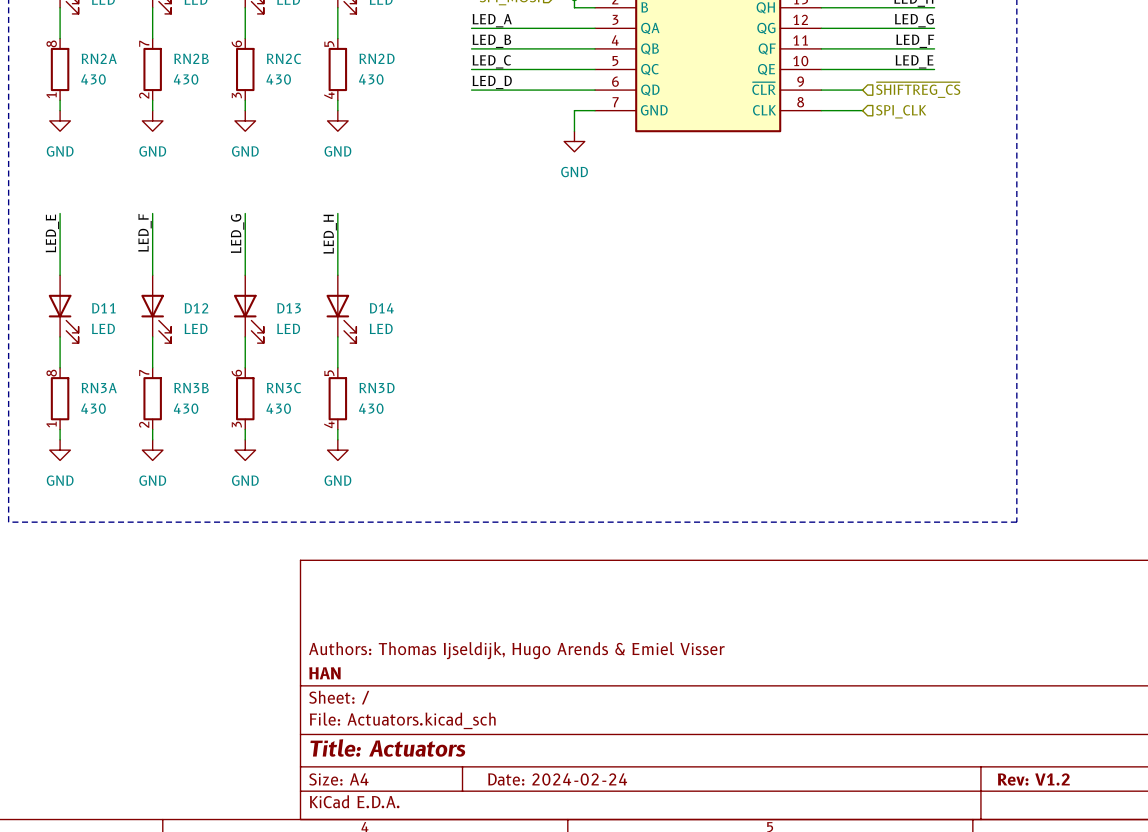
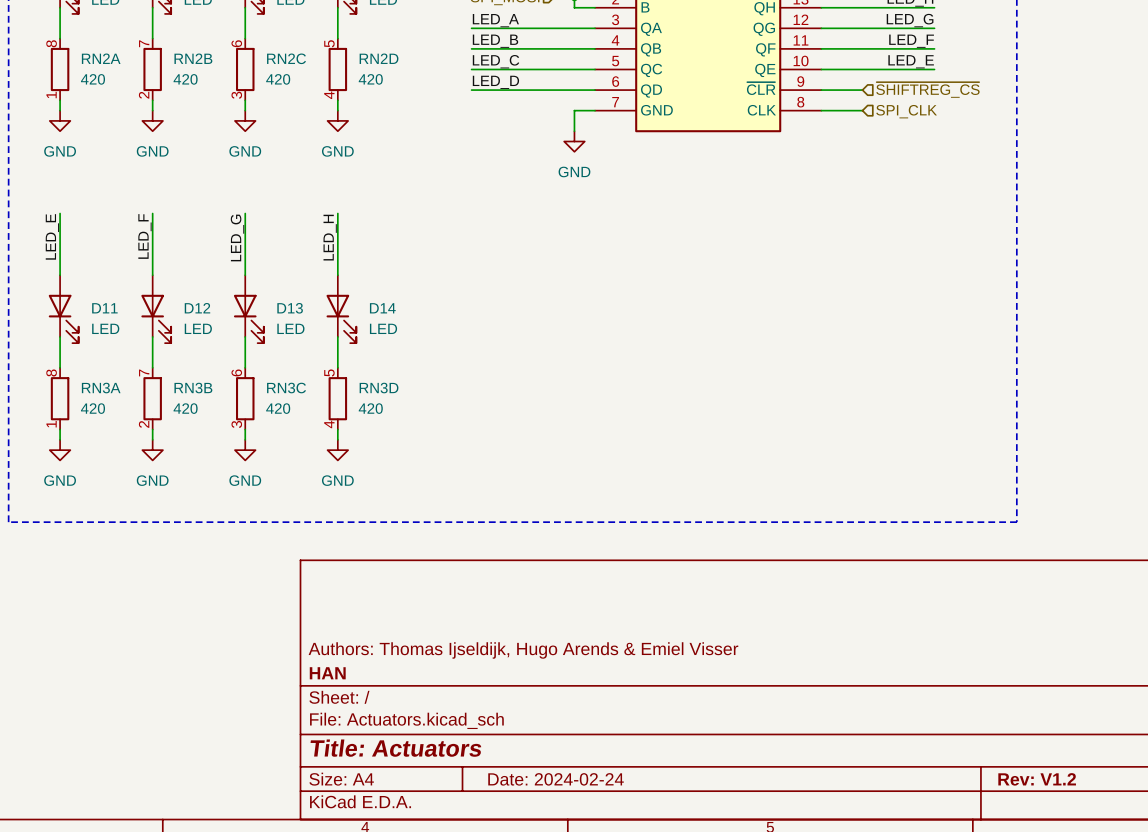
RN2A value: 430 (93, 79) -> 420 (93, 79)
RN2B value: 430 (186, 79) -> 420 (185, 79)
RN2C value: 430 (278, 79) -> 420 (278, 79)
RN2D value: 430 (371, 79) -> 420 (370, 79)
RN3A value: 430 (93, 408) -> 420 (93, 408)
RN3B value: 430 (186, 408) -> 420 (185, 408)
RN3C value: 430 (278, 408) -> 420 (278, 408)
RN3D value: 430 (371, 408) -> 420 (370, 408)

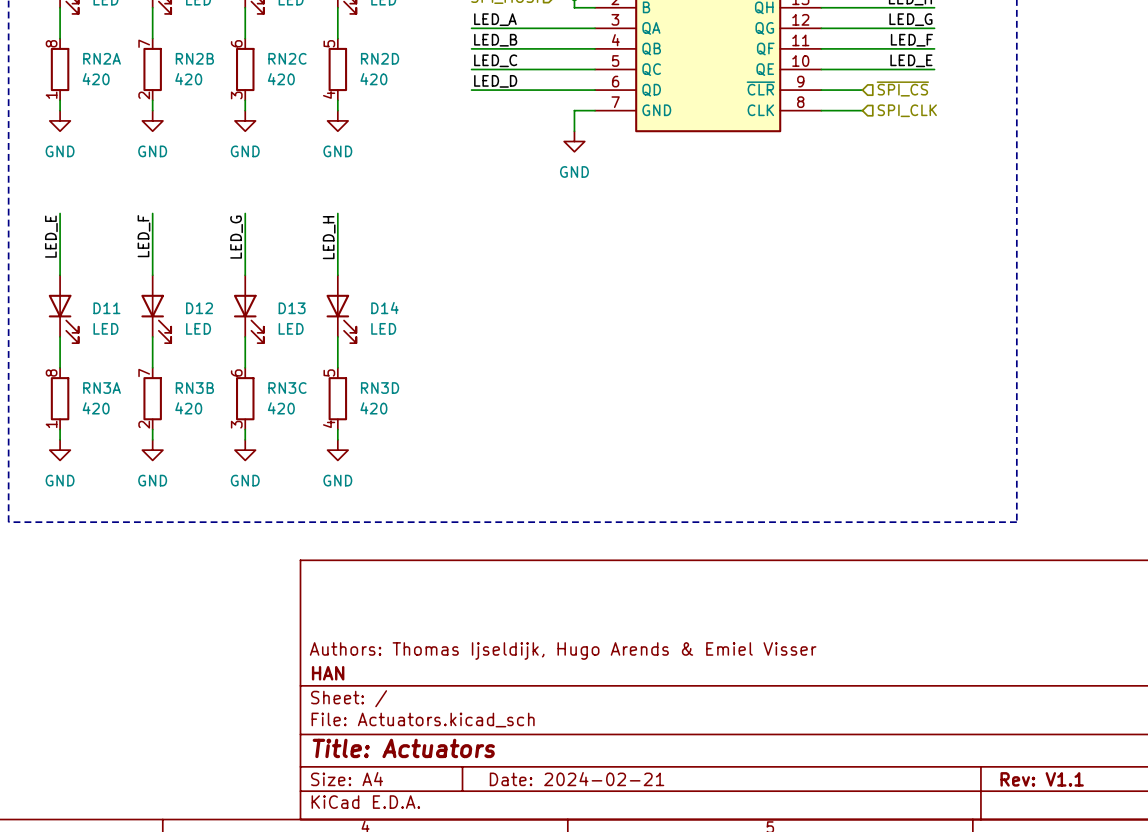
hierarchical label: ~{SHIFTREG_CS} (927, 89) -> ~{SPI_CS} (902, 88)
title block: Date: 2024-02-24 (556, 779) -> Date: 2024-02-21 (577, 779)
title block: Rev: V1.2 (1037, 779) -> Rev: V1.1 (1042, 779)

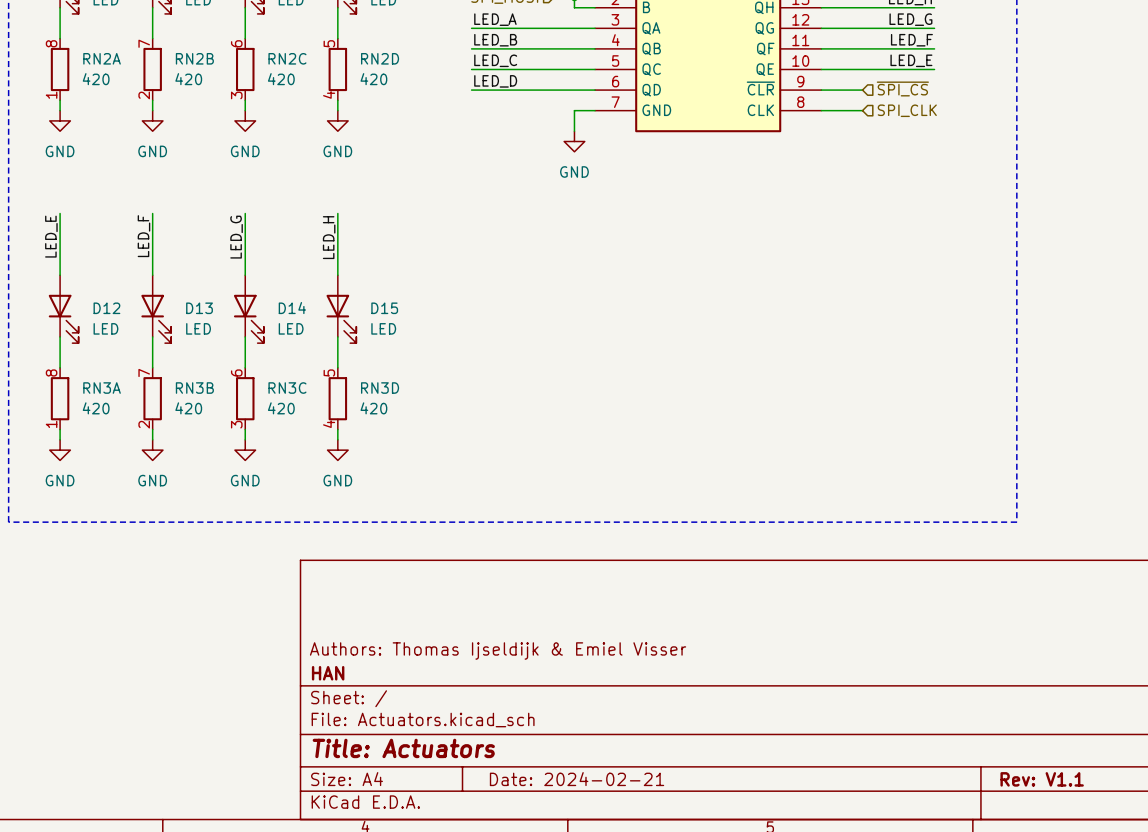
D11 name: D11 (106, 308) -> D12 (106, 308)
D12 name: D12 (199, 308) -> D13 (199, 308)
D13 name: D13 (292, 308) -> D14 (292, 308)
D14 name: D14 (384, 308) -> D15 (384, 308)
title block: Authors: Thomas Ijseldijk, Hugo Arends & Emiel Visser (563, 650) -> Authors: Thomas Ijseldijk & Emiel Visser (498, 650)

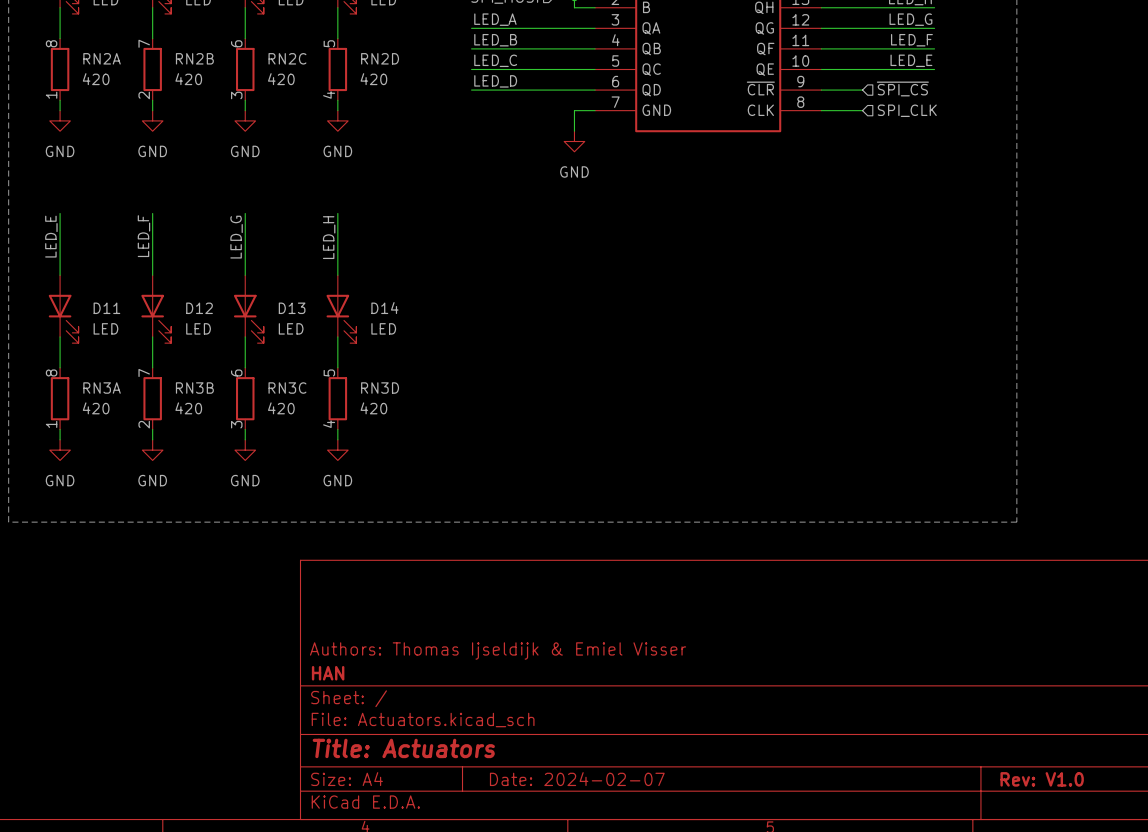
D12 name: D12 (106, 308) -> D11 (106, 308)
D13 name: D13 (199, 308) -> D12 (199, 308)
D14 name: D14 (292, 308) -> D13 (292, 308)
D15 name: D15 (384, 308) -> D14 (384, 308)
title block: Date: 2024-02-21 (577, 779) -> Date: 2024-02-07 (577, 779)
title block: Rev: V1.1 (1042, 779) -> Rev: V1.0 (1042, 779)

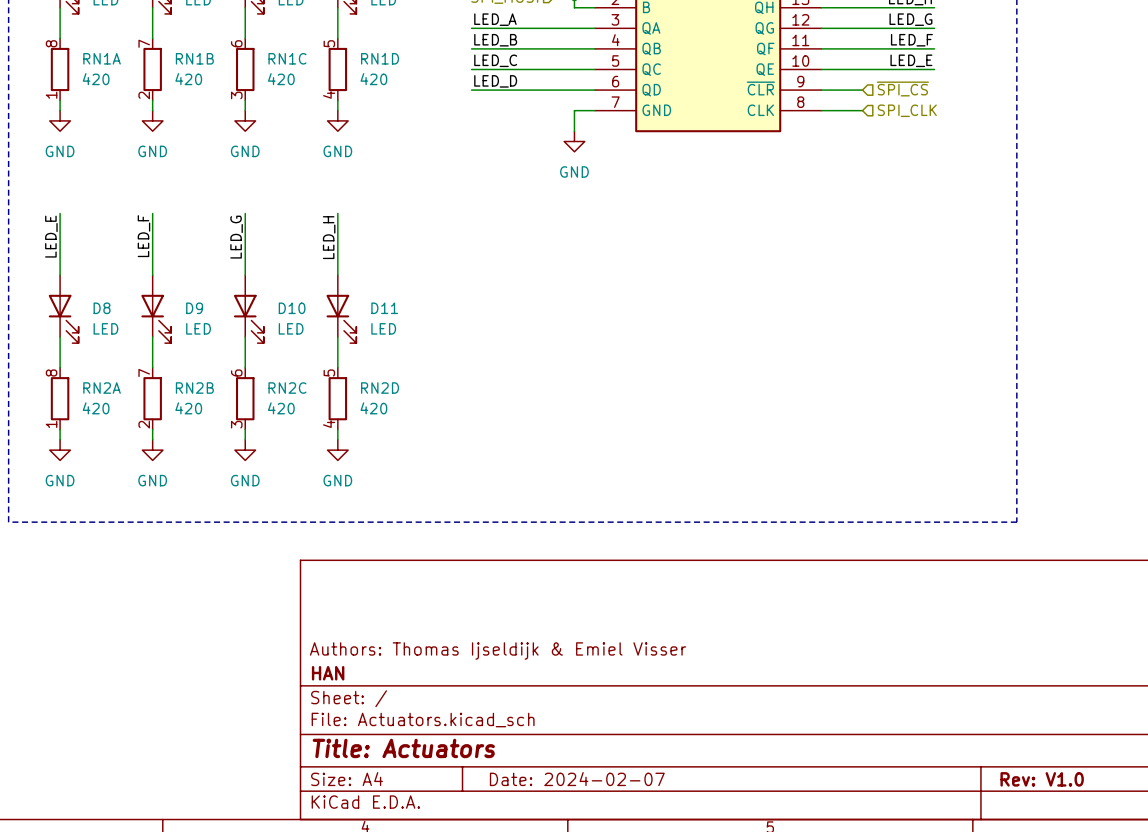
RN2A name: RN2A (102, 58) -> RN1A (102, 58)
RN2B name: RN2B (194, 58) -> RN1B (194, 58)
RN2C name: RN2C (287, 58) -> RN1C (287, 58)
RN2D name: RN2D (380, 58) -> RN1D (380, 58)
D11 name: D11 (106, 308) -> D8 (102, 308)
D12 name: D12 (199, 308) -> D9 (194, 308)
D13 name: D13 (292, 308) -> D10 (292, 308)
D14 name: D14 (384, 308) -> D11 (384, 308)
RN3A name: RN3A (102, 388) -> RN2A (102, 388)
RN3B name: RN3B (194, 388) -> RN2B (194, 388)
RN3C name: RN3C (287, 388) -> RN2C (287, 388)
RN3D name: RN3D (380, 388) -> RN2D (380, 388)

